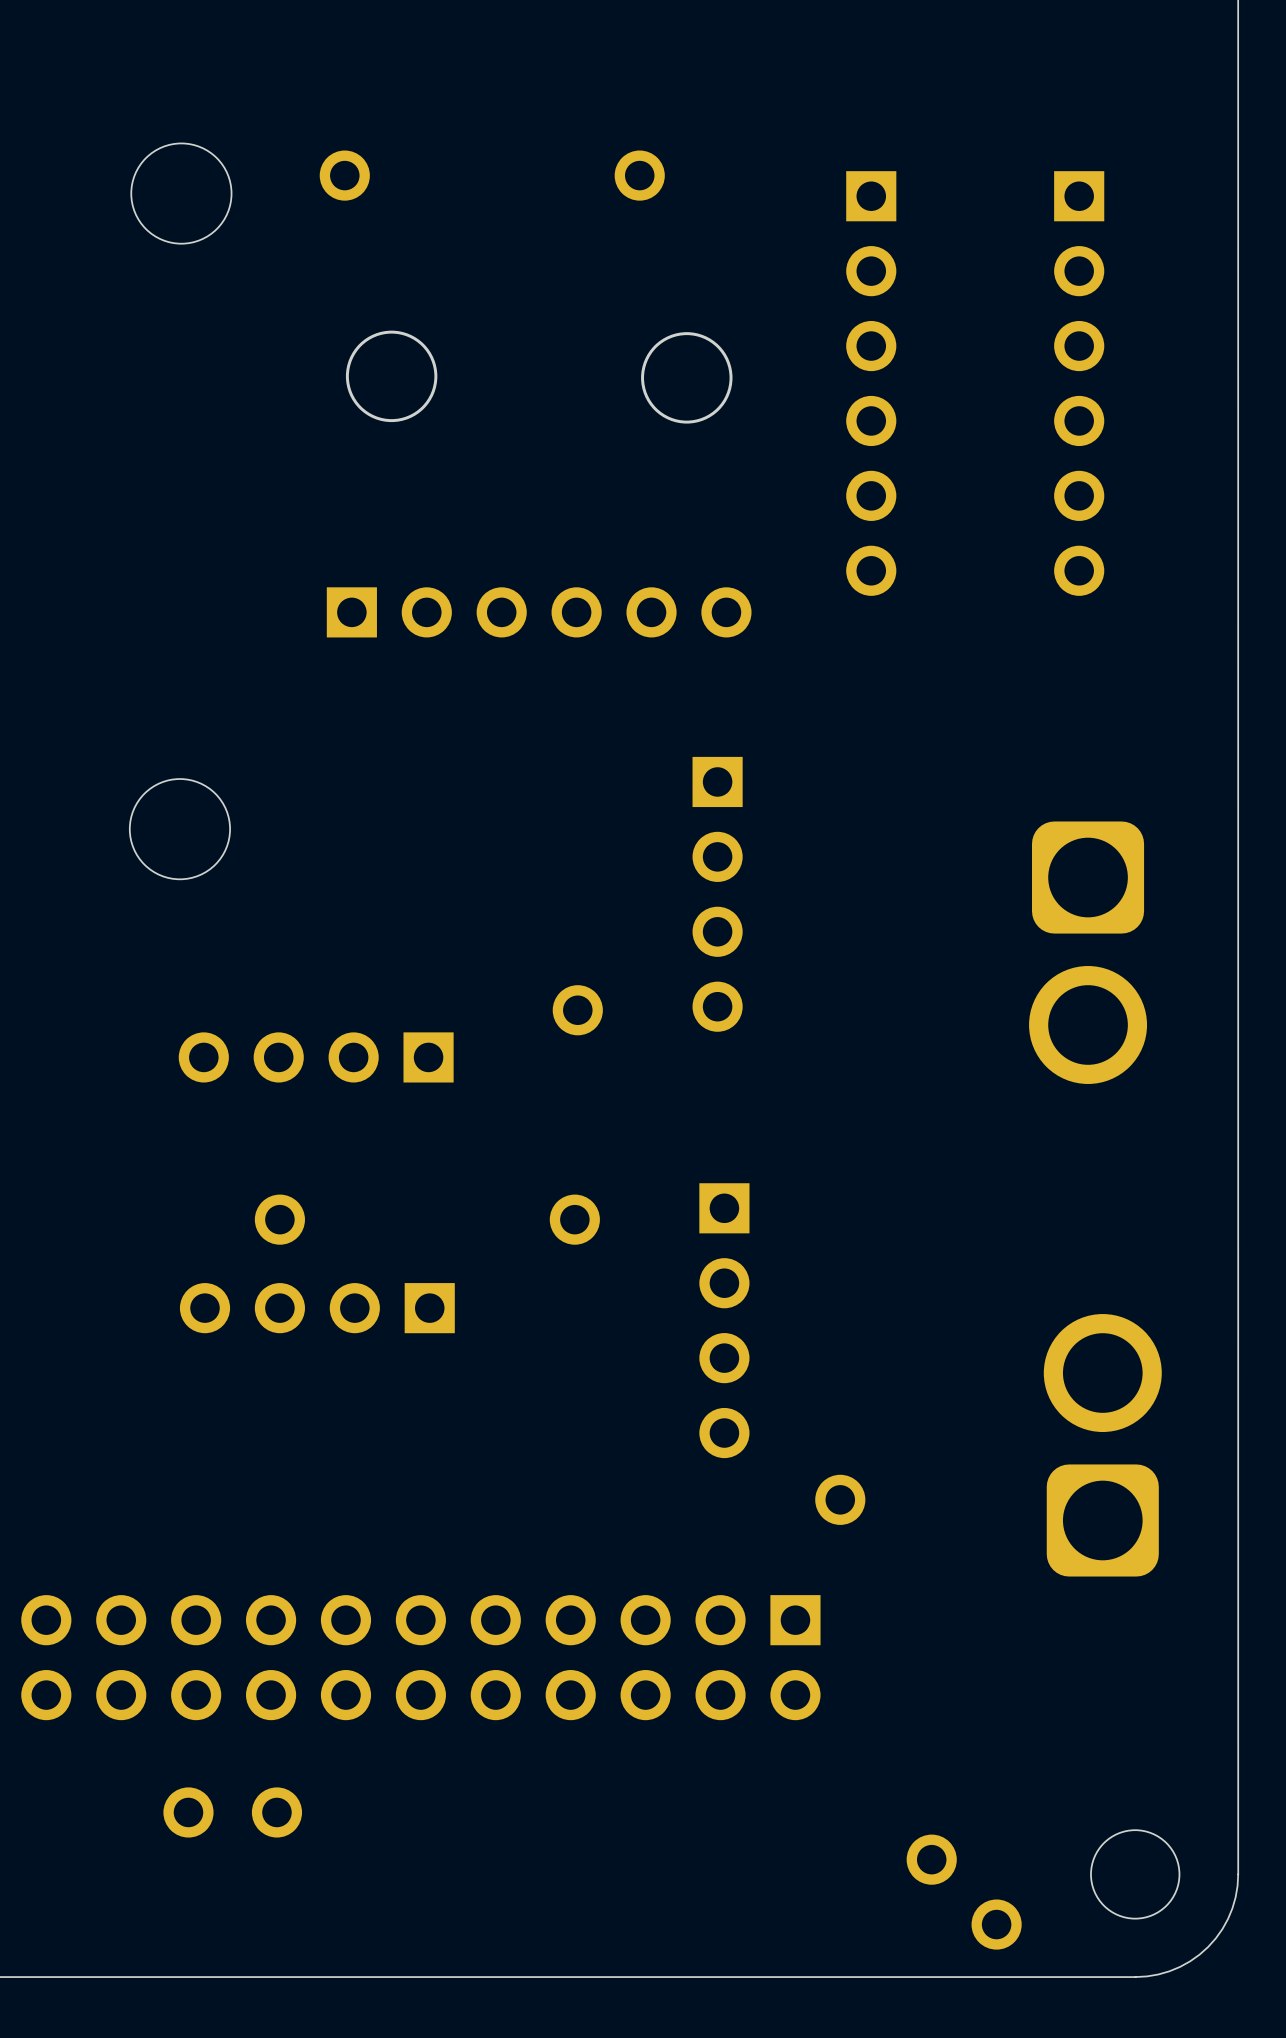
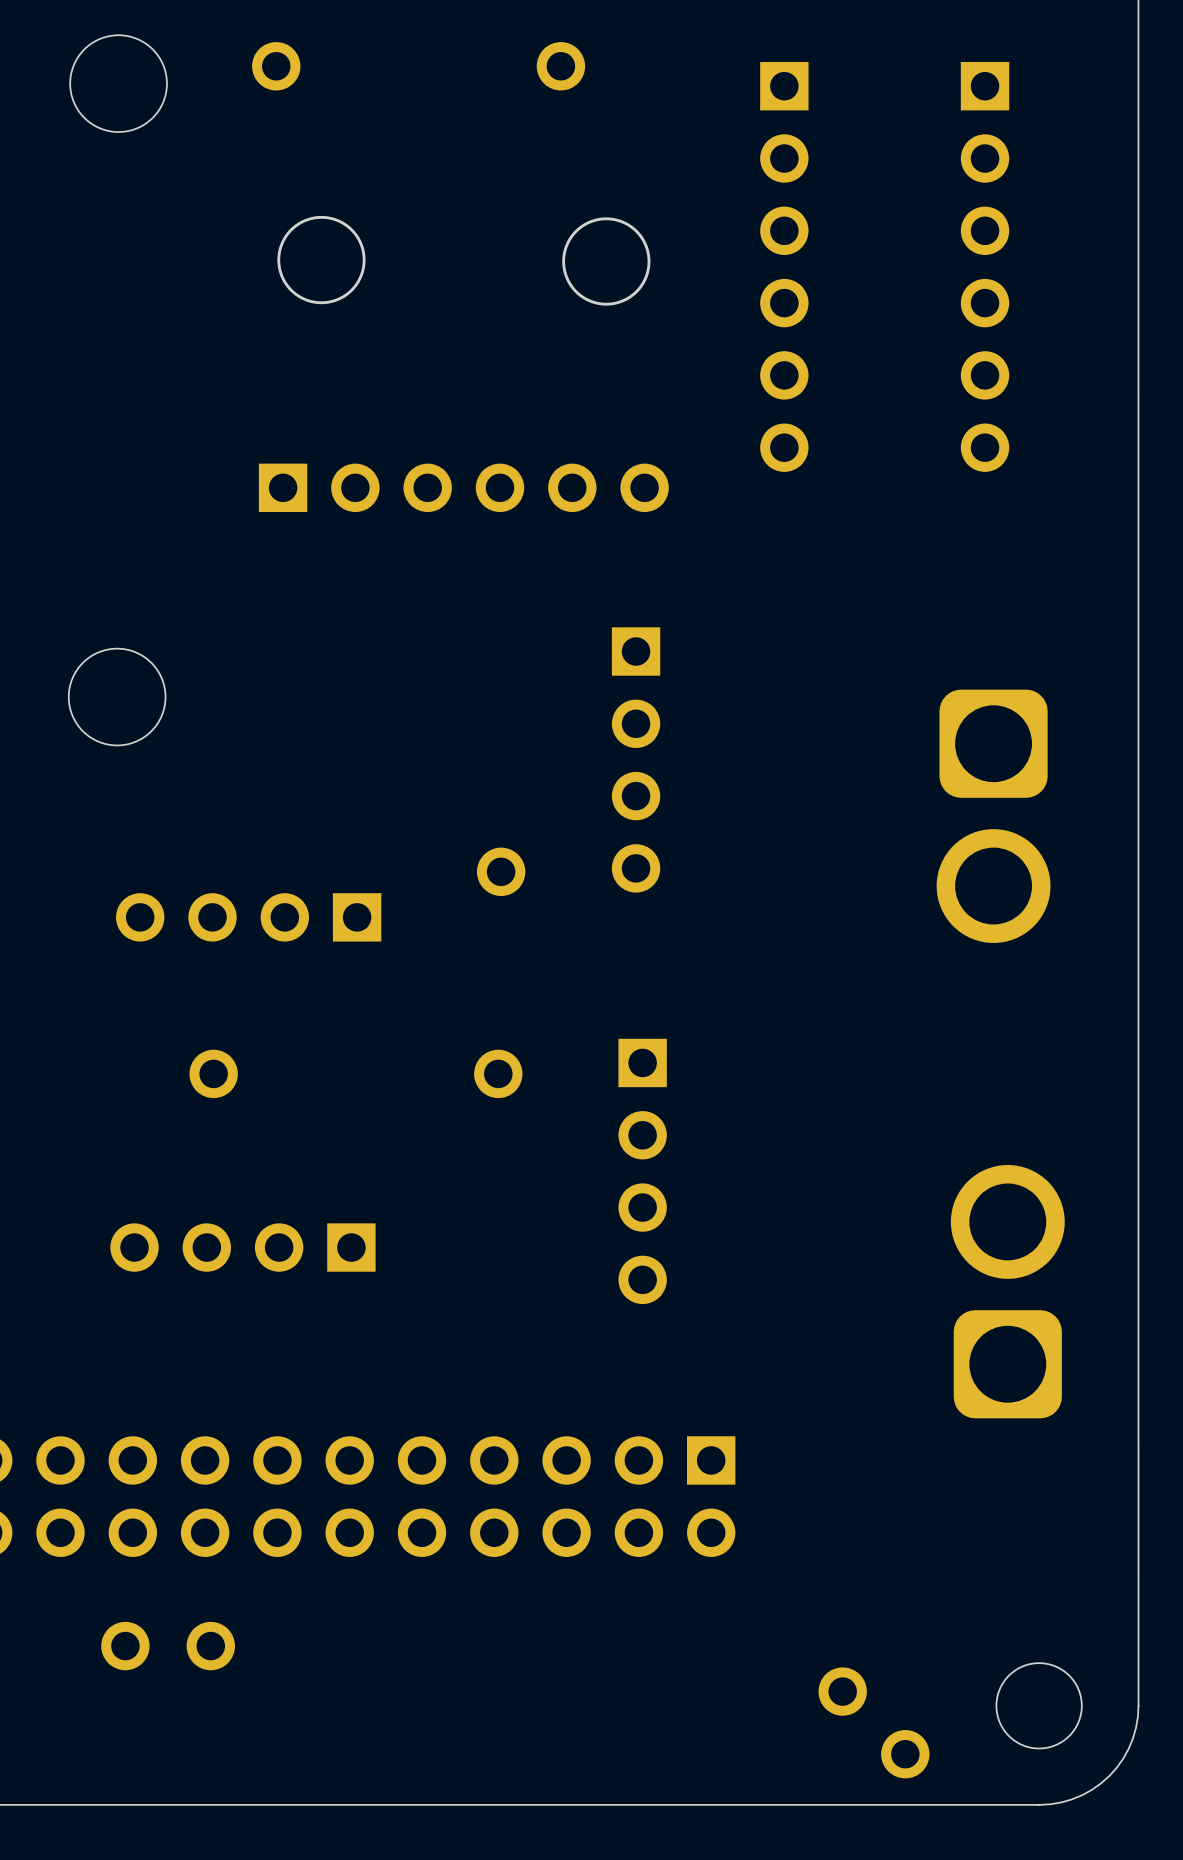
part position: (317, 1308) -> (242, 1247)
part: (840, 1499) -> none

